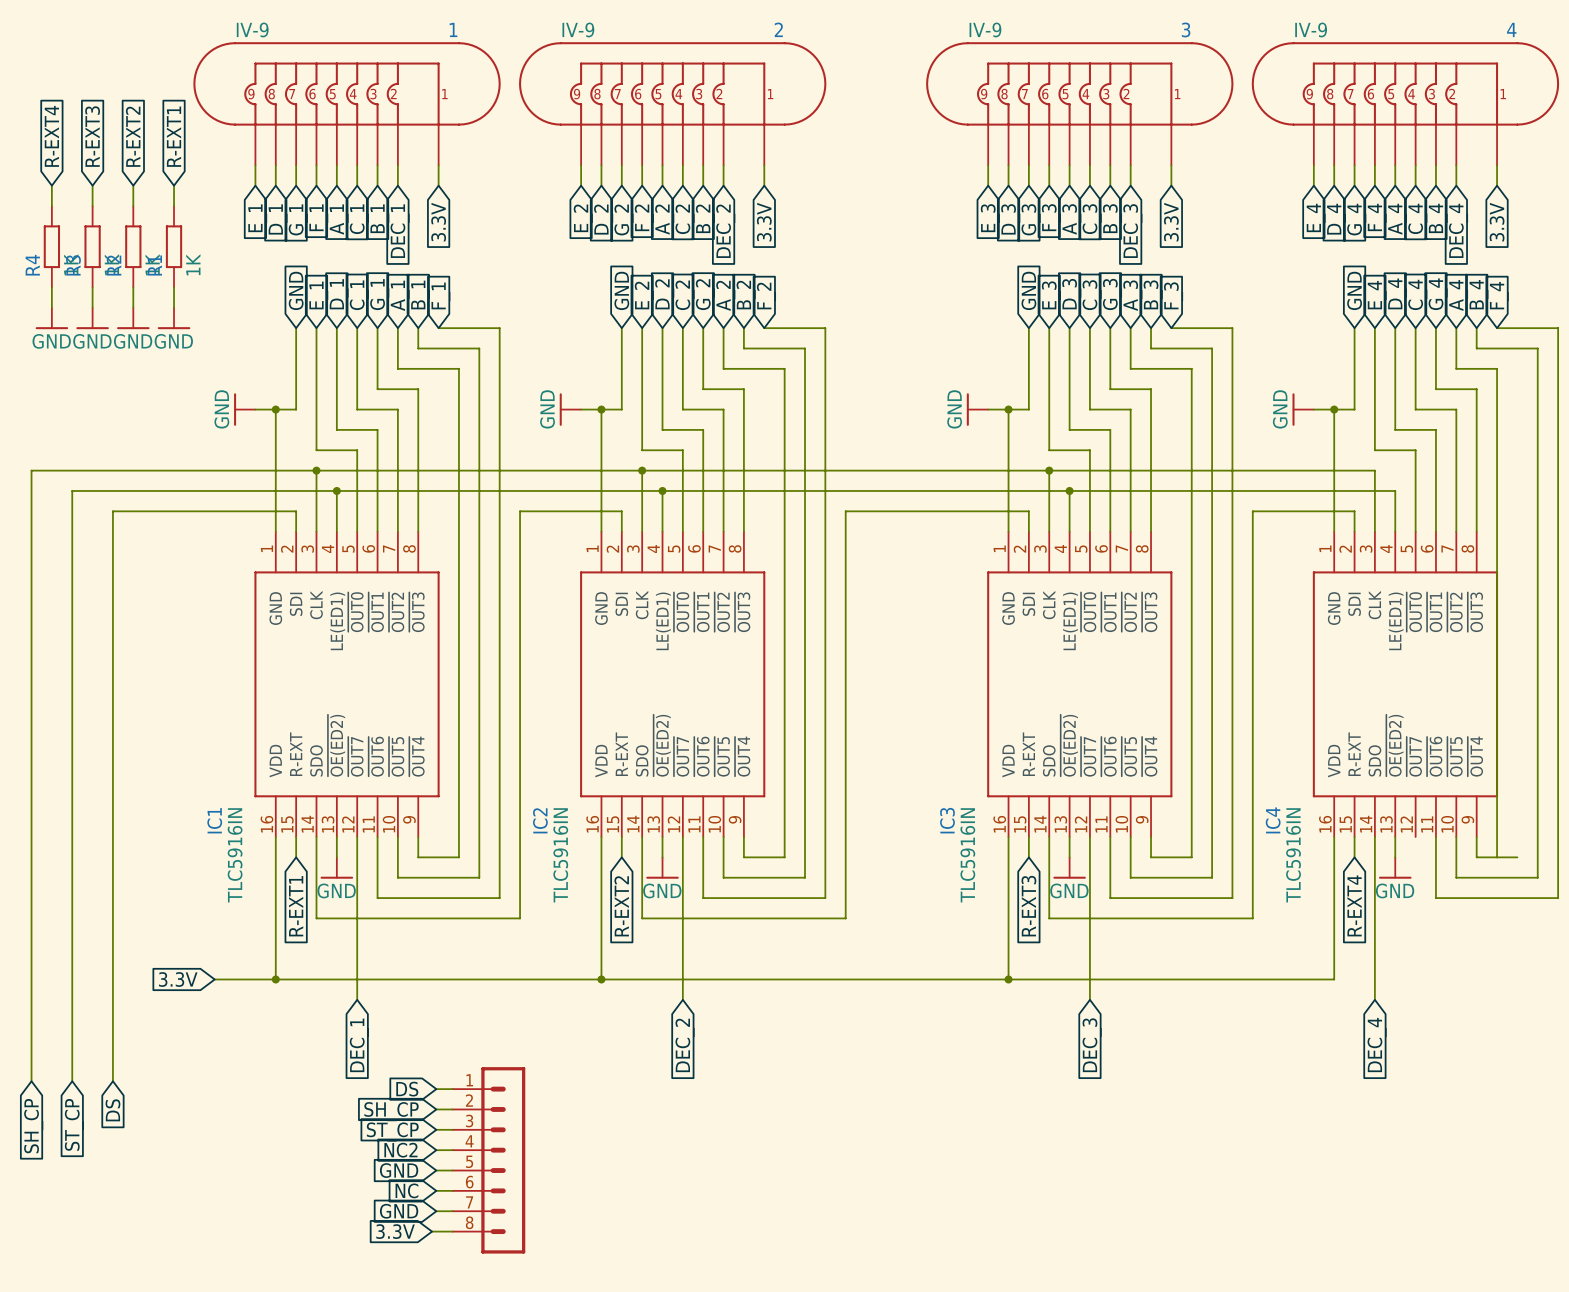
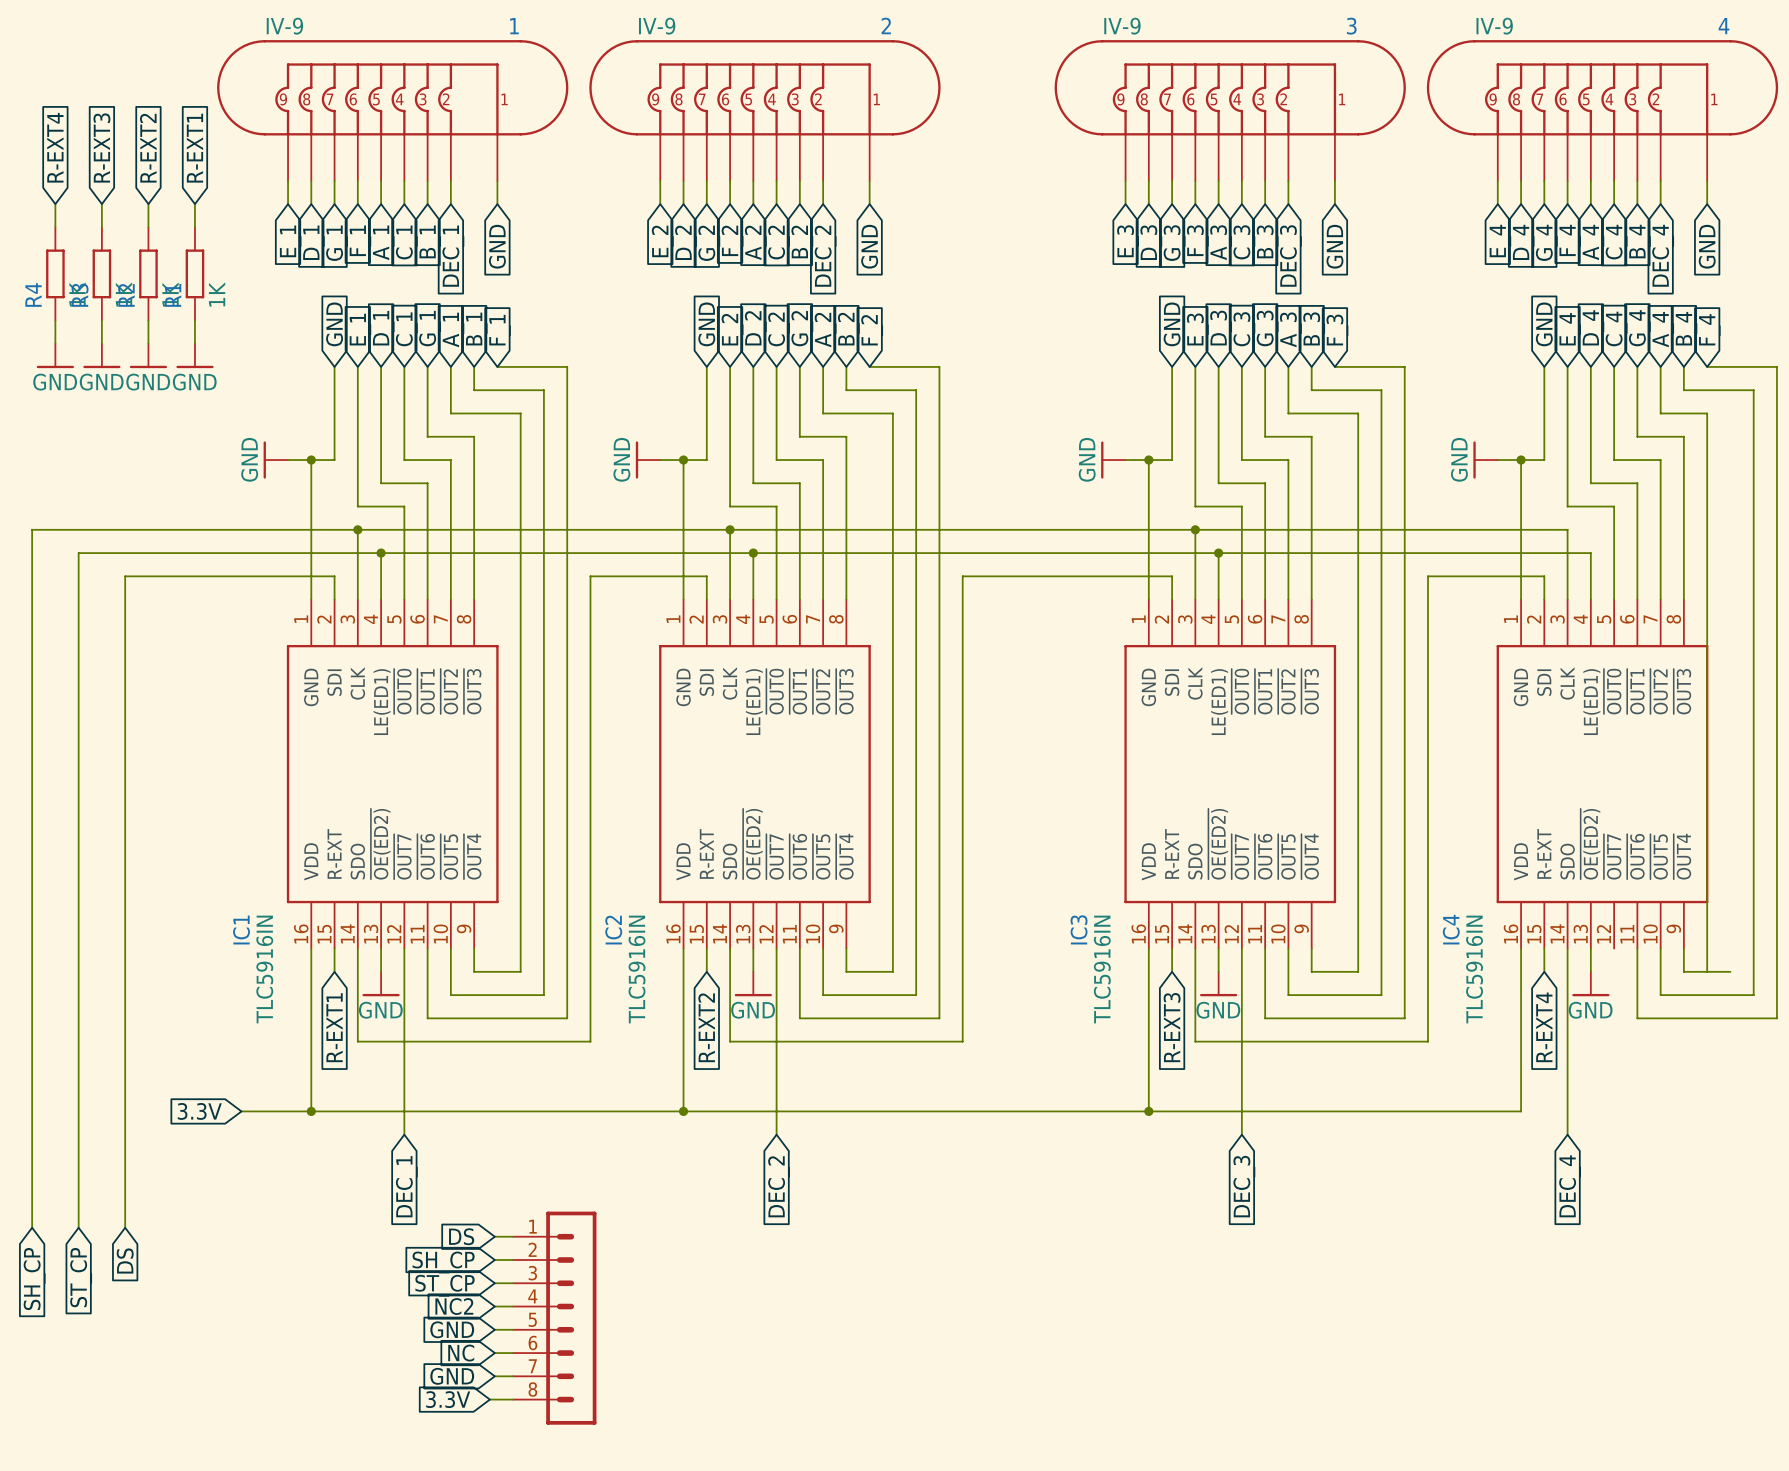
global label: 3.3V (438, 222) -> GND (497, 246)
global label: 3.3V (764, 222) -> GND (869, 246)
global label: 3.3V (1171, 222) -> GND (1334, 246)
global label: 3.3V (1497, 222) -> GND (1707, 246)

